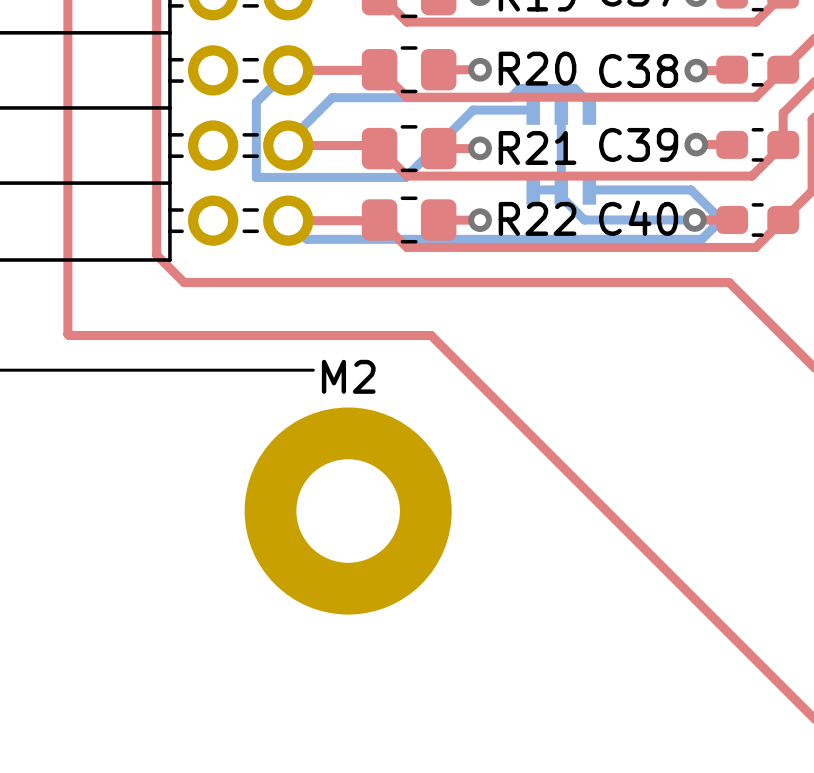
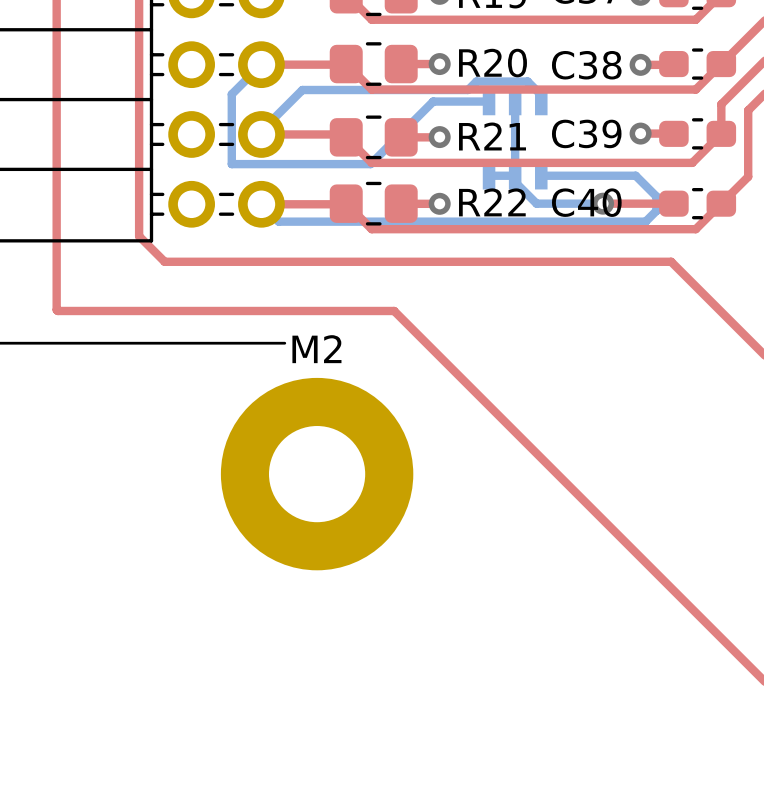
top track: none -> (603, 203) (639, 203)
bottom track: (655, 219) (694, 219) -> none
via position: (694, 219) -> (603, 203)

